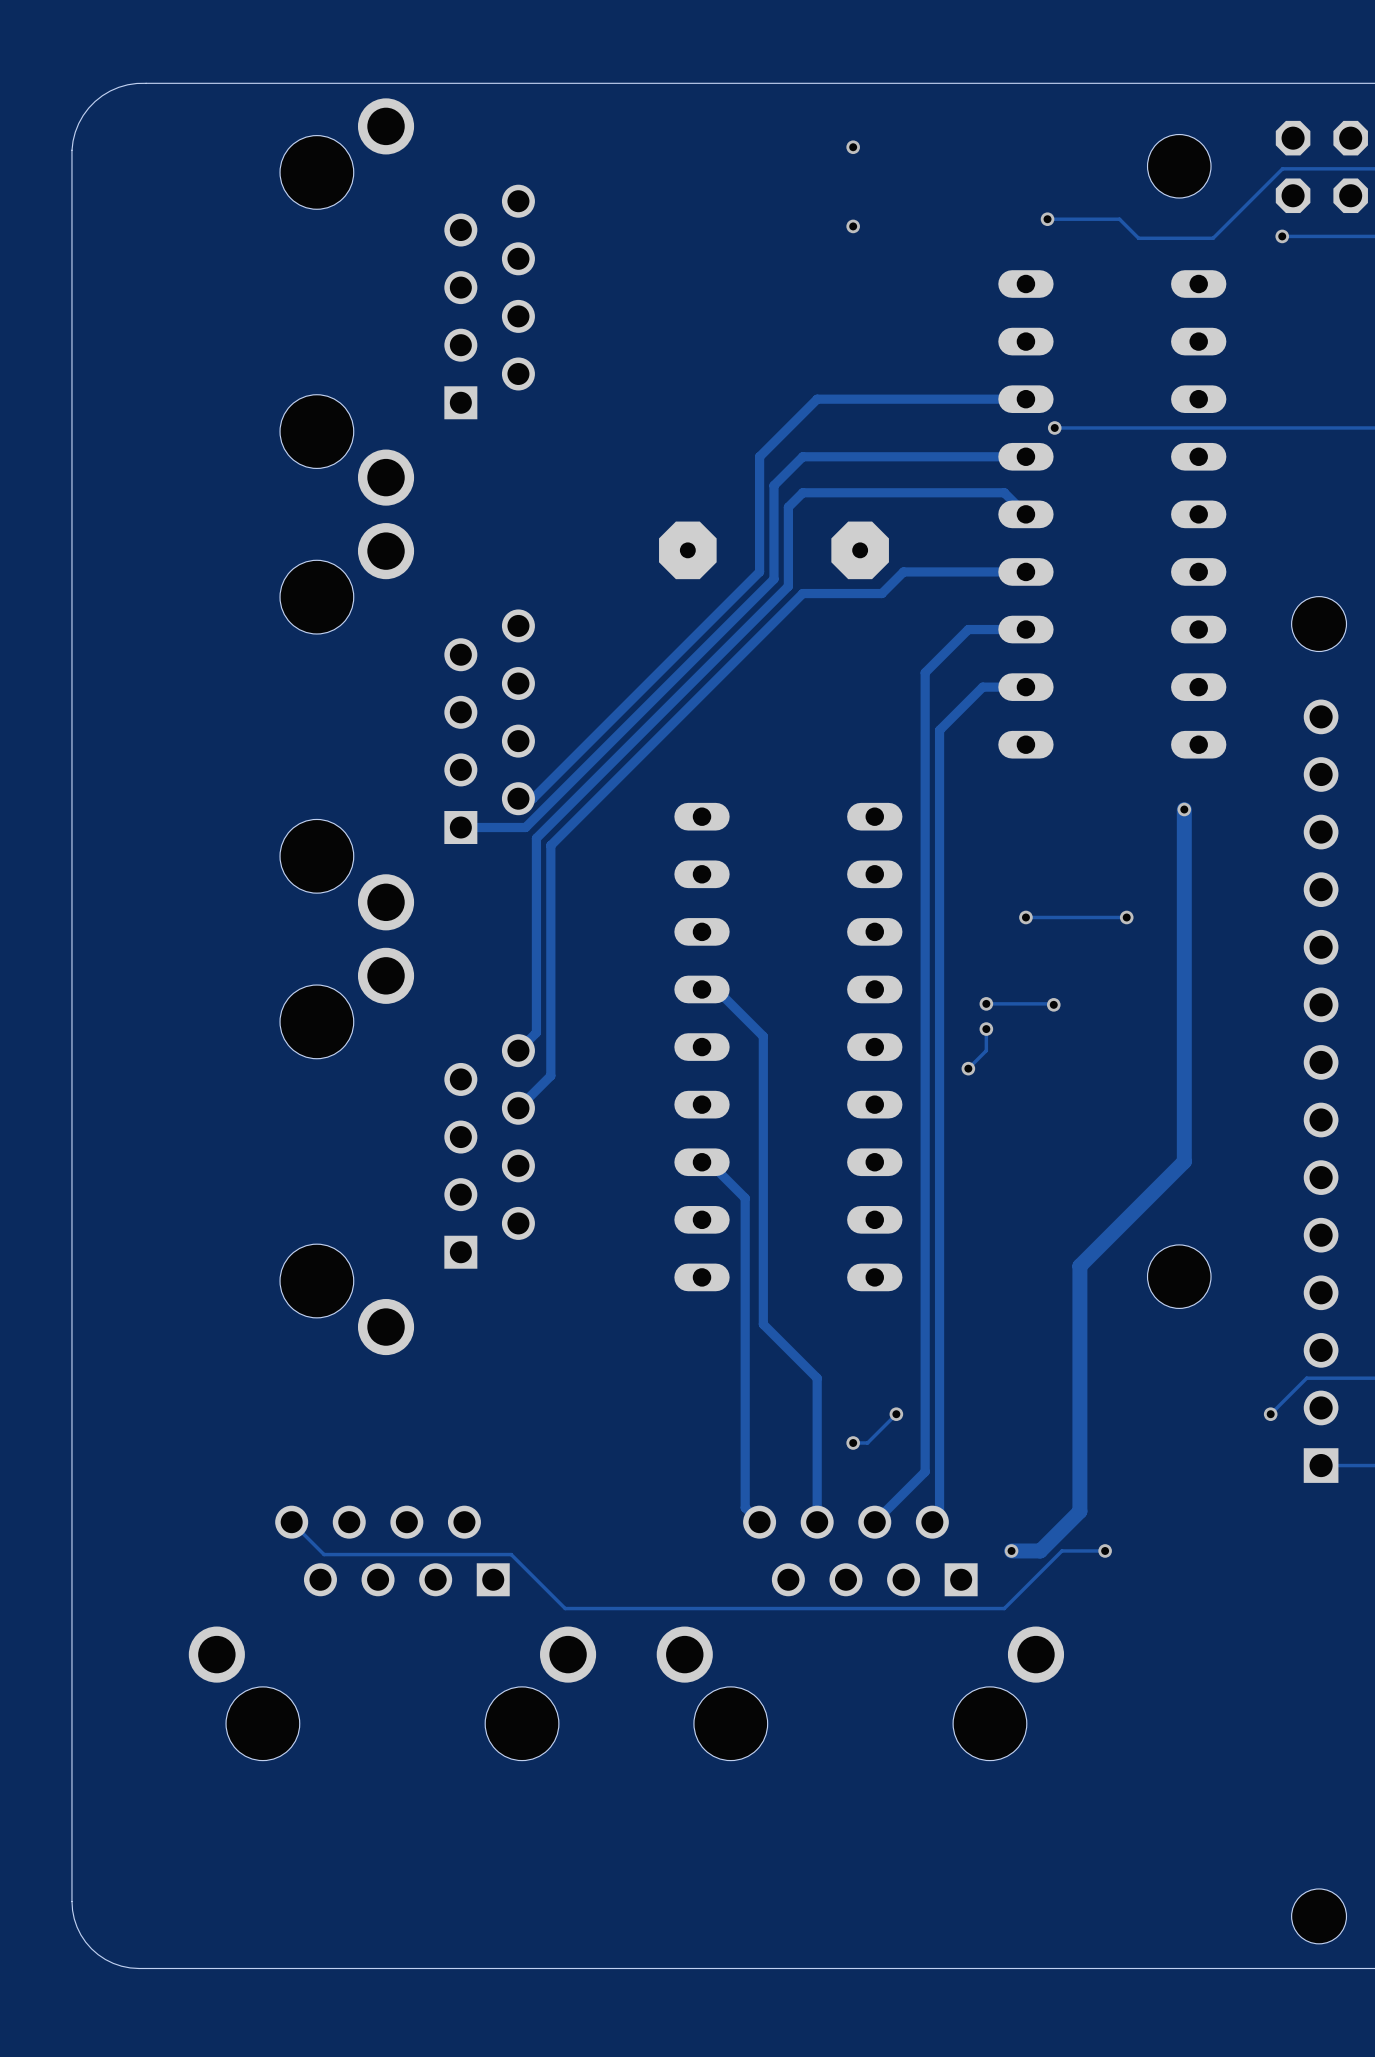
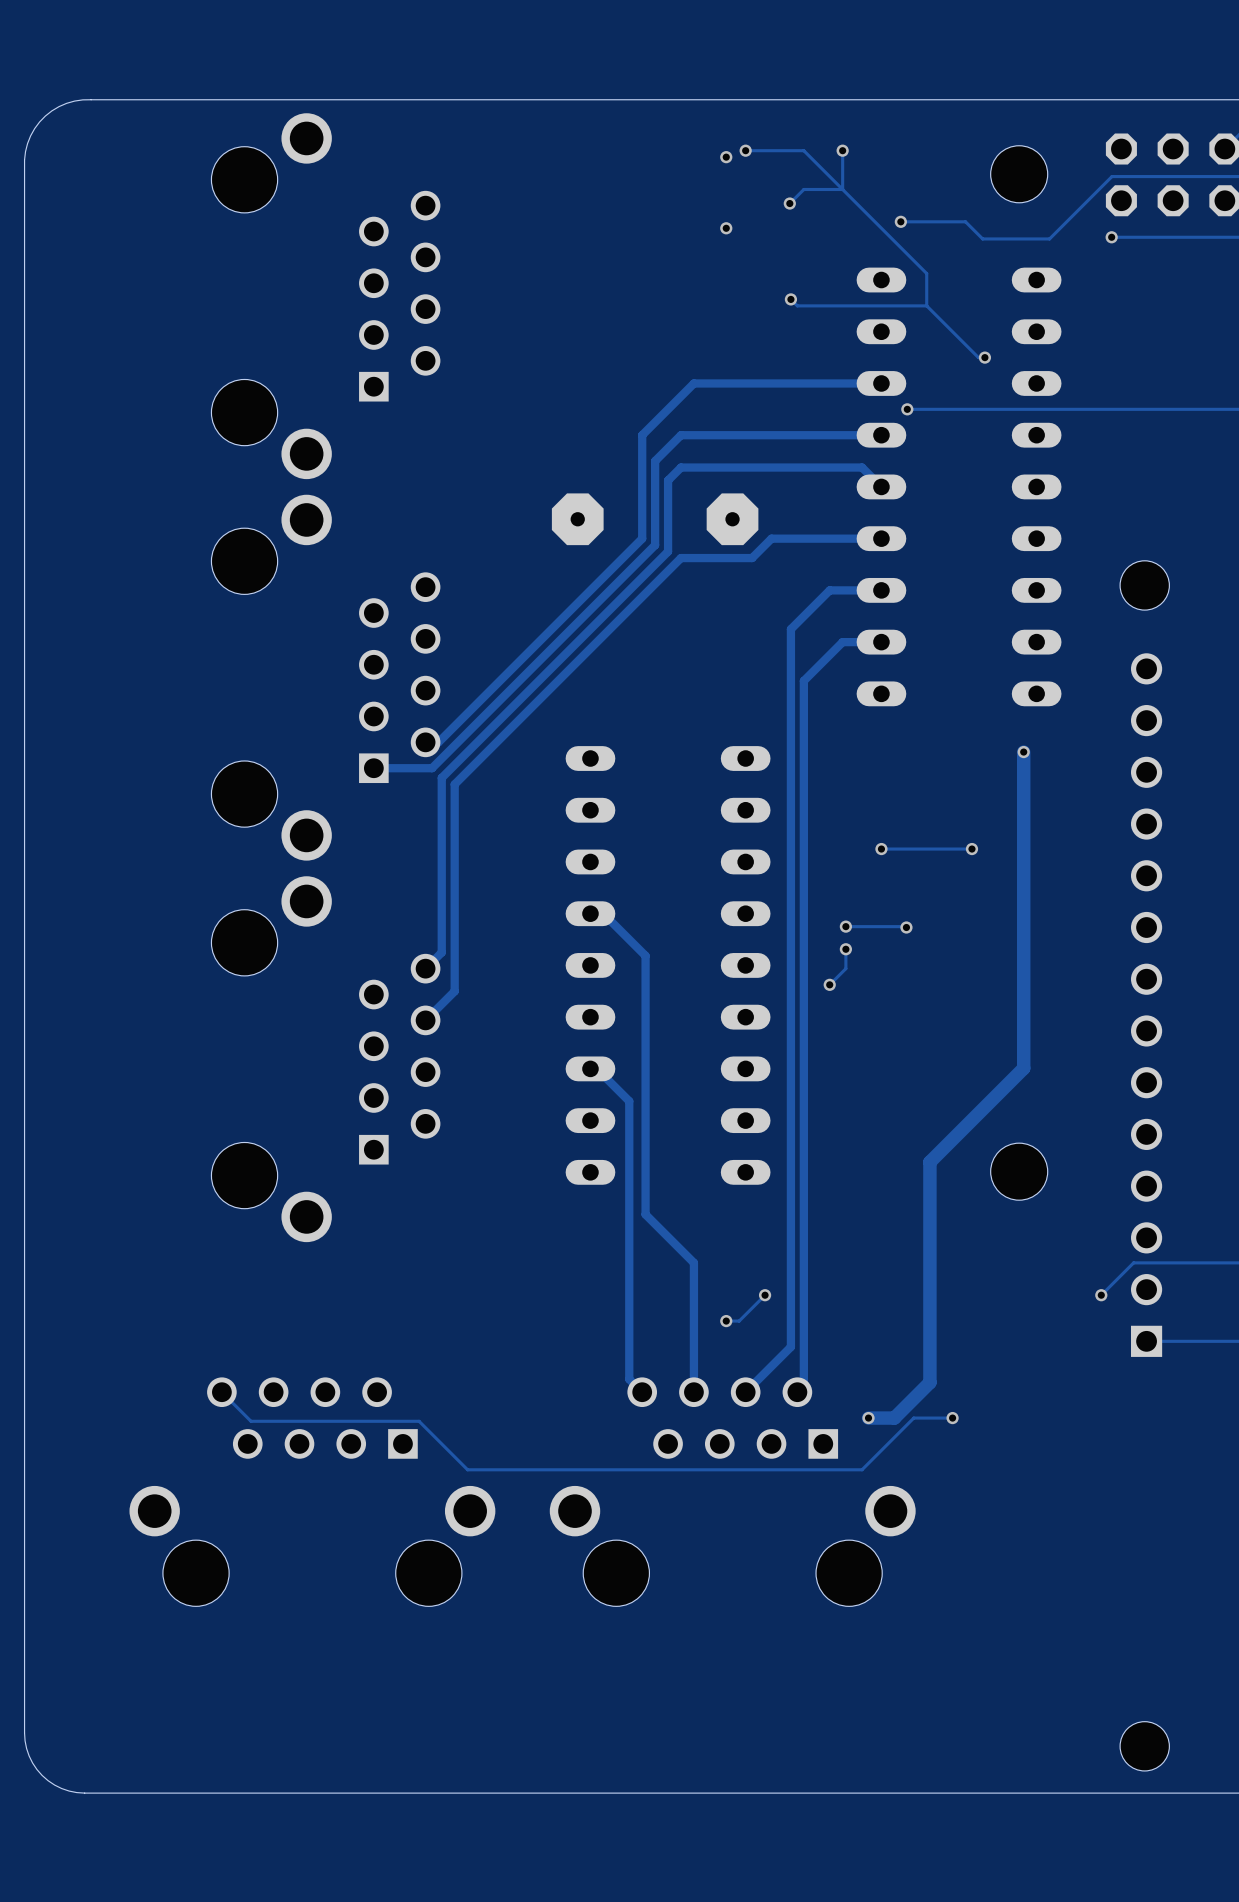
track: none -> (745, 150) (803, 150) (926, 273) (926, 305)
via: none -> (745, 150)
track: none -> (842, 150) (842, 189) (803, 189) (789, 203)
via: none -> (842, 150)
via: none -> (789, 203)
track: none -> (790, 299) (797, 305) (926, 305)
via: none -> (790, 299)
track: none -> (926, 305) (978, 357) (984, 357)
via: none -> (984, 357)

